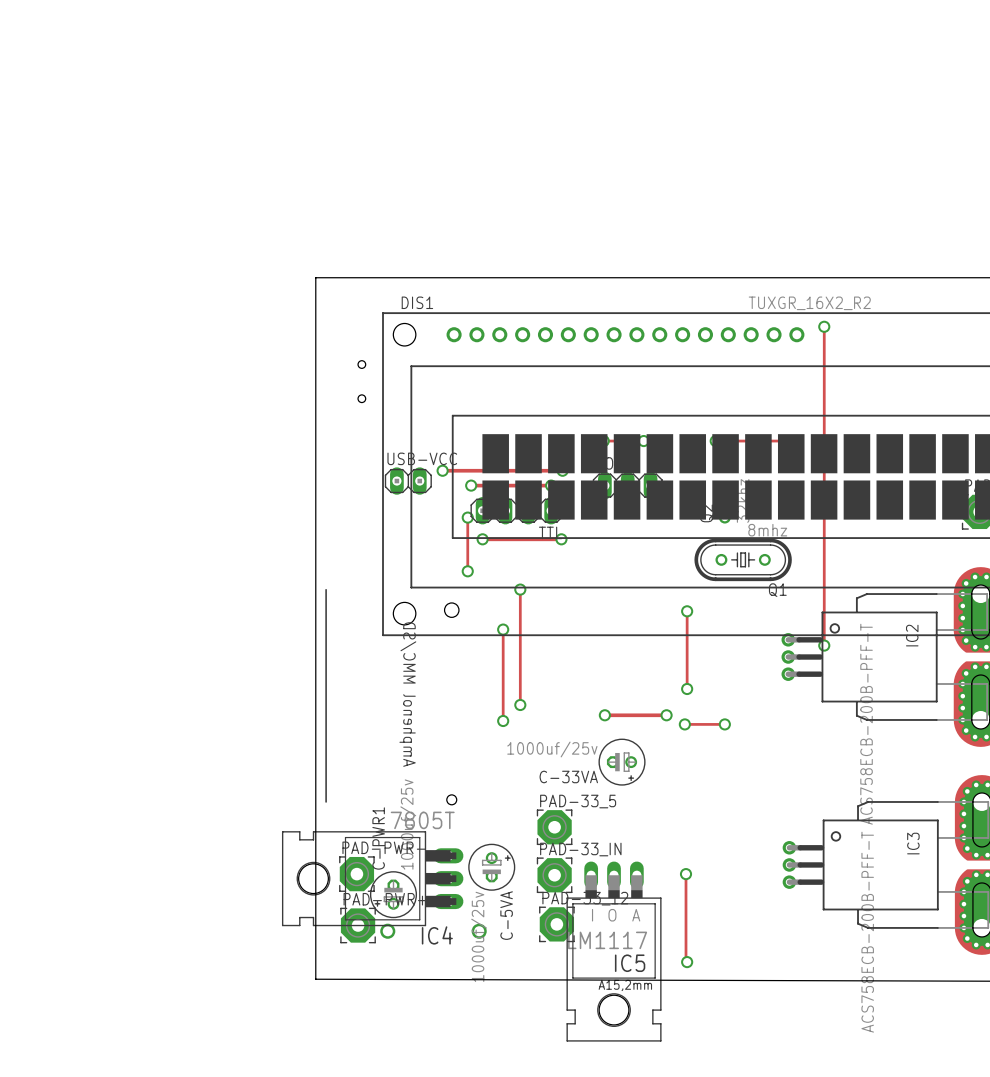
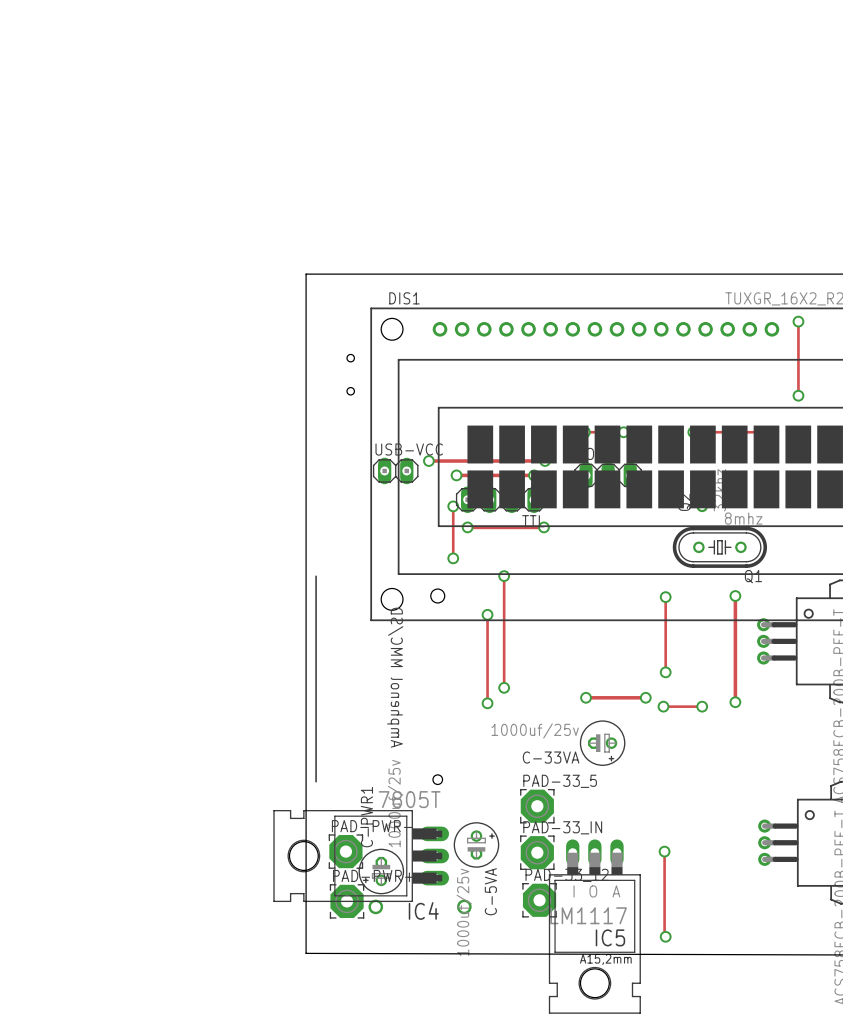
track: (824, 403) (824, 645) -> none
via: none -> (798, 395)
track: none -> (735, 596) (735, 702)
via: none -> (735, 596)
via: (824, 645) -> none
via: none -> (735, 702)

